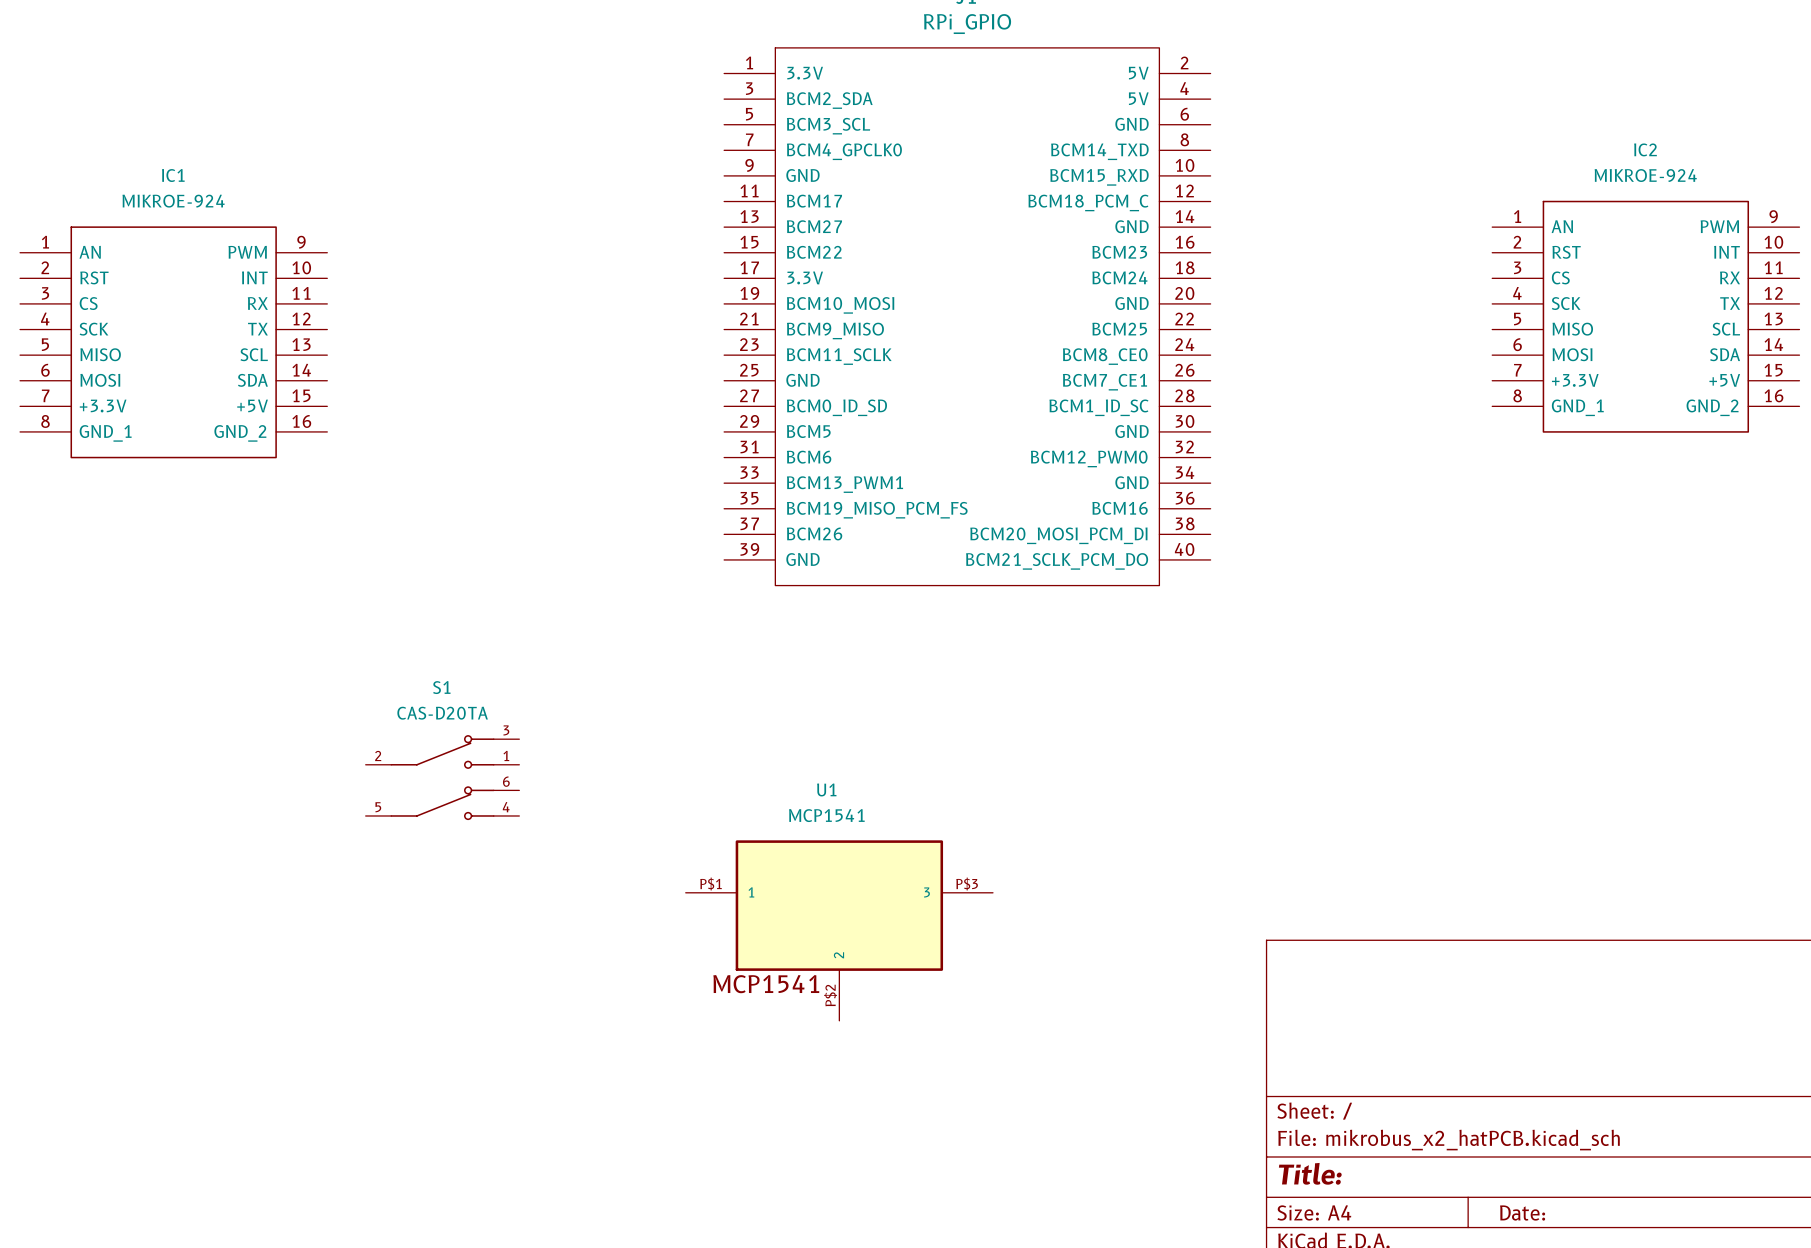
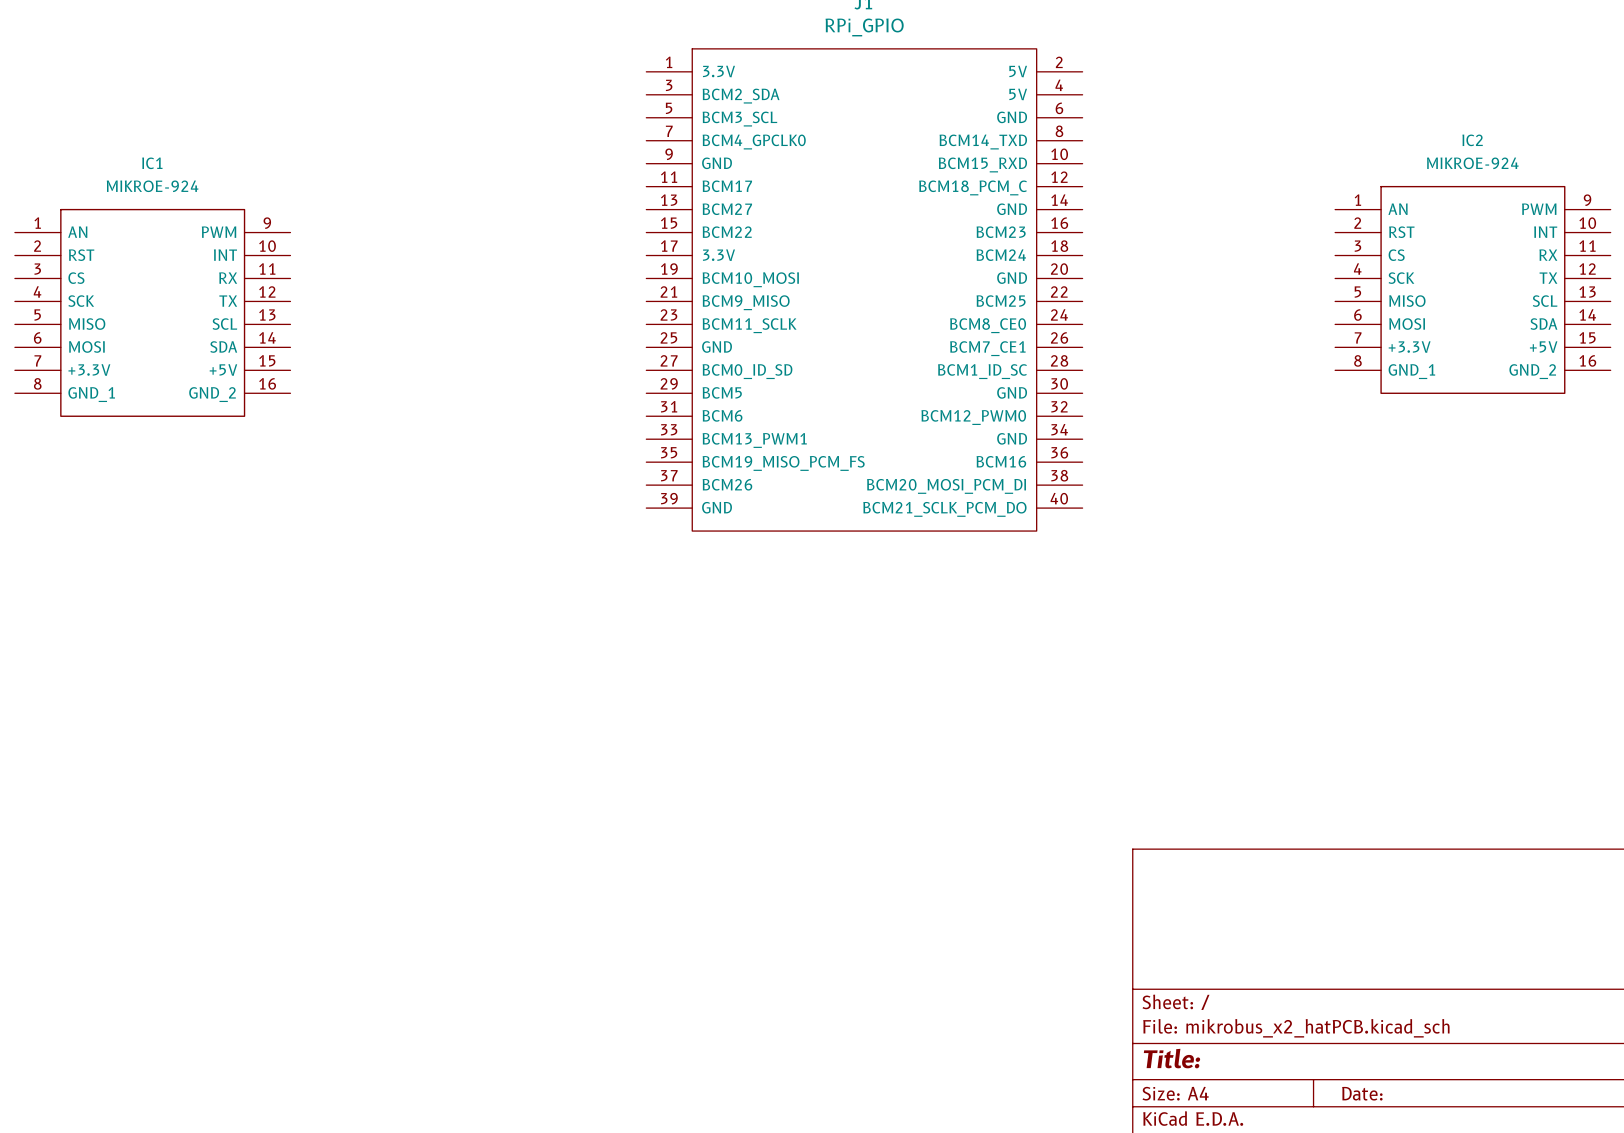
S1: CAS-D20TA (442, 777) -> none
U1: MCP1541 (839, 930) -> none

